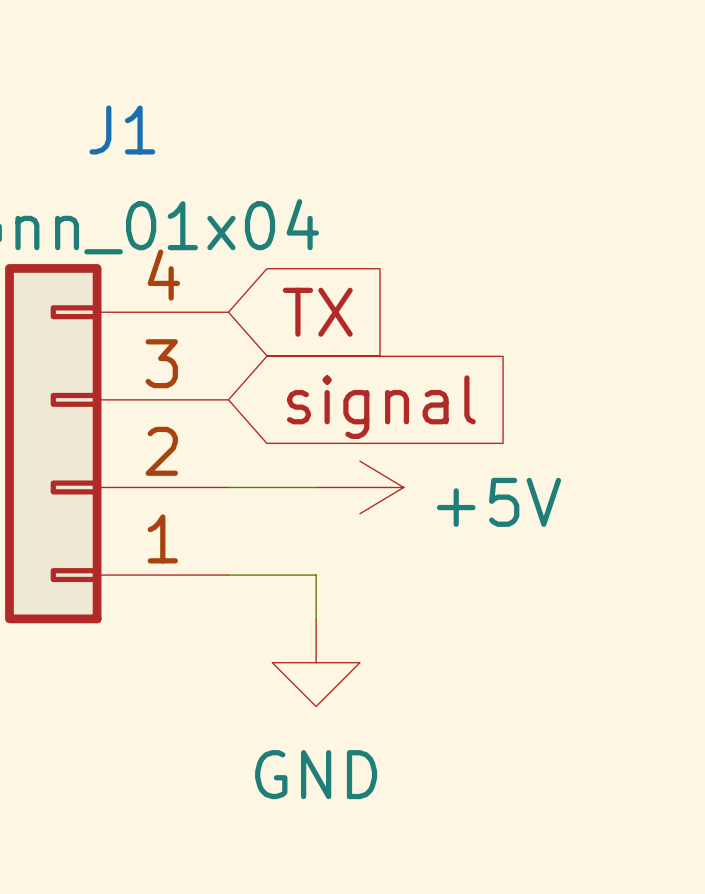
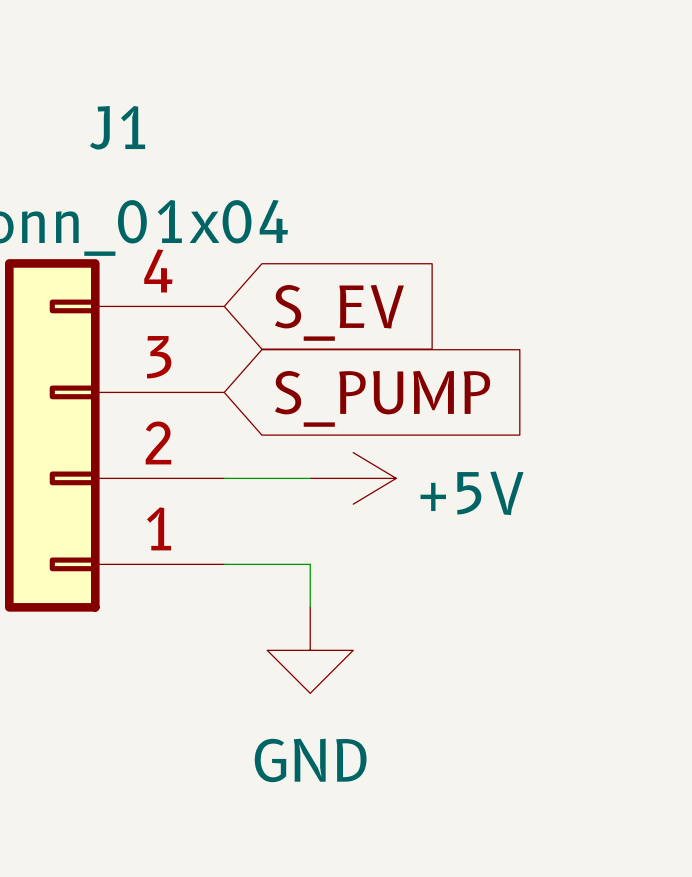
global label: TX (317, 312) -> S_EV (339, 312)
global label: signal (381, 407) -> S_PUMP (382, 398)

